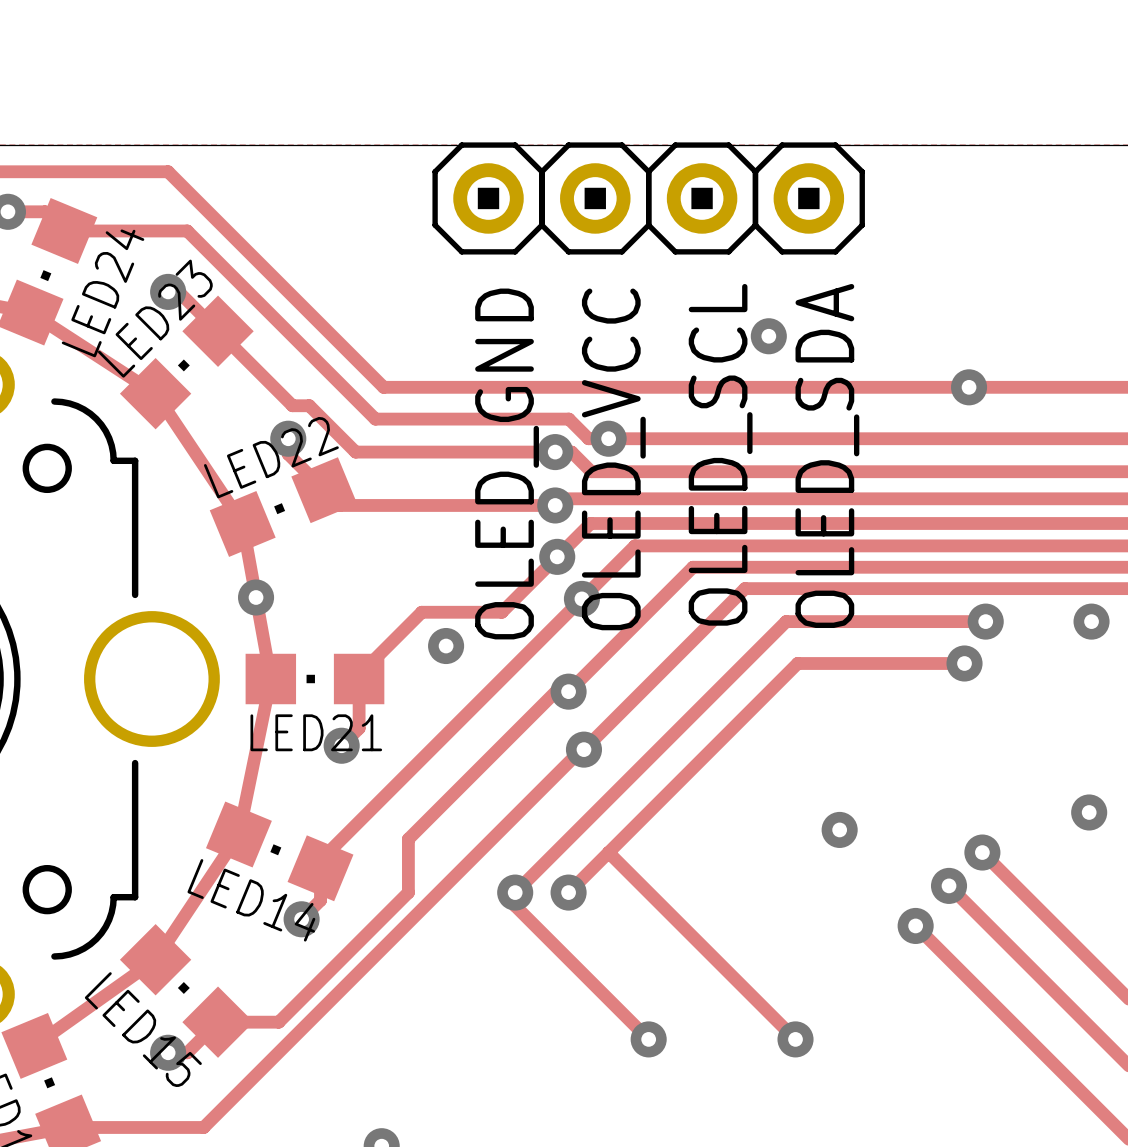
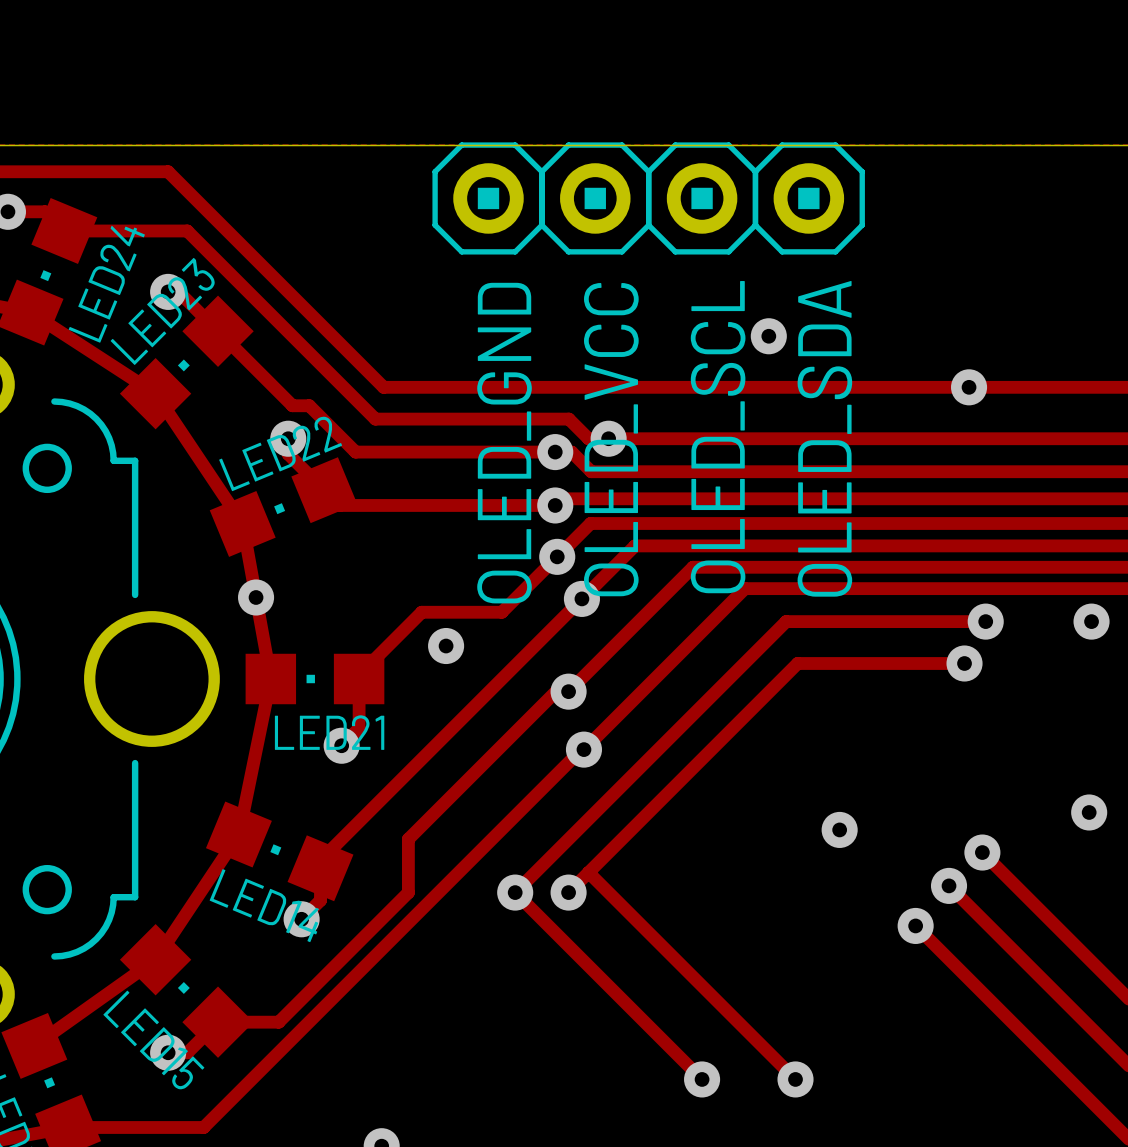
track: (608, 852) (795, 1039) -> none
track: none -> (588, 872) (795, 1079)
track: (515, 892) (515, 905) (648, 1039) -> (515, 892) (702, 1079)
via: (648, 1039) -> none
via position: (795, 1039) -> (795, 1079)
via: none -> (702, 1079)

